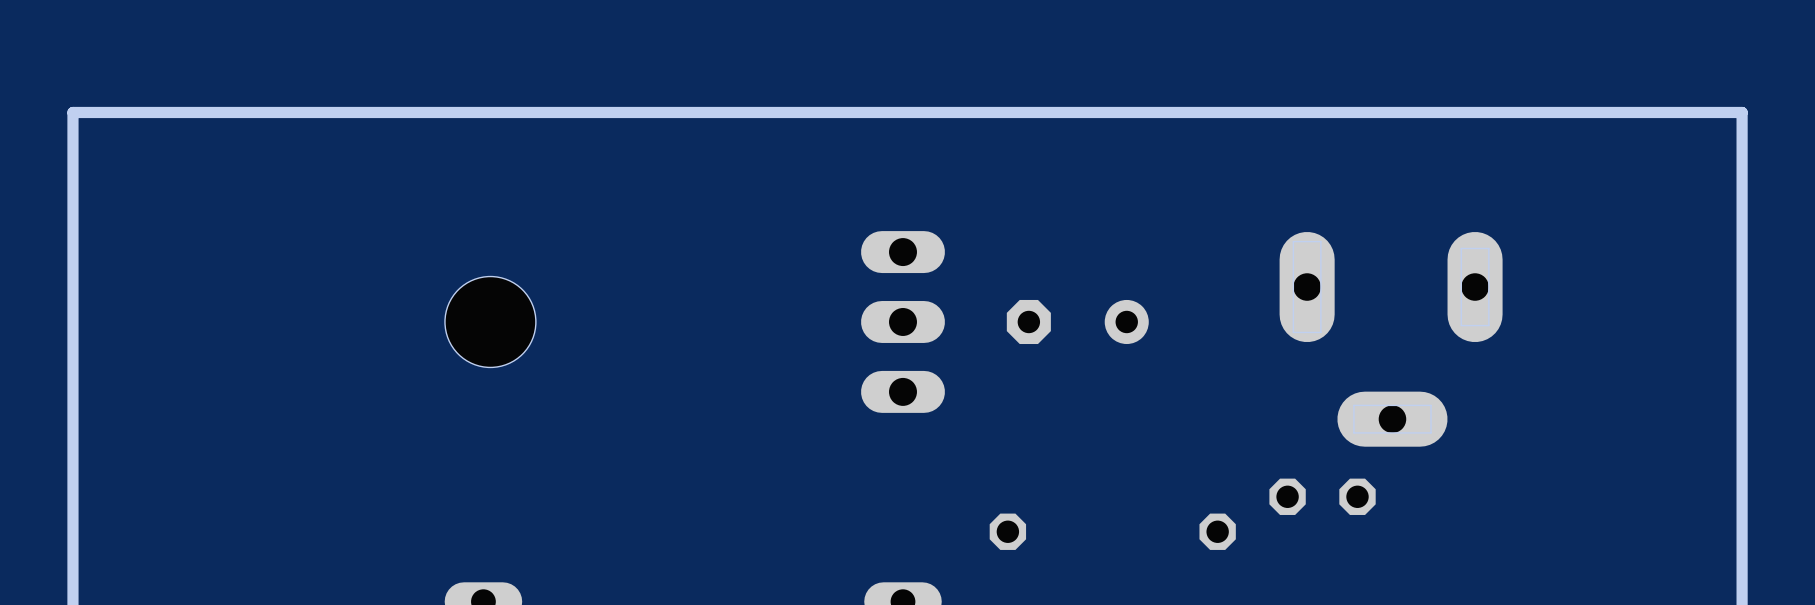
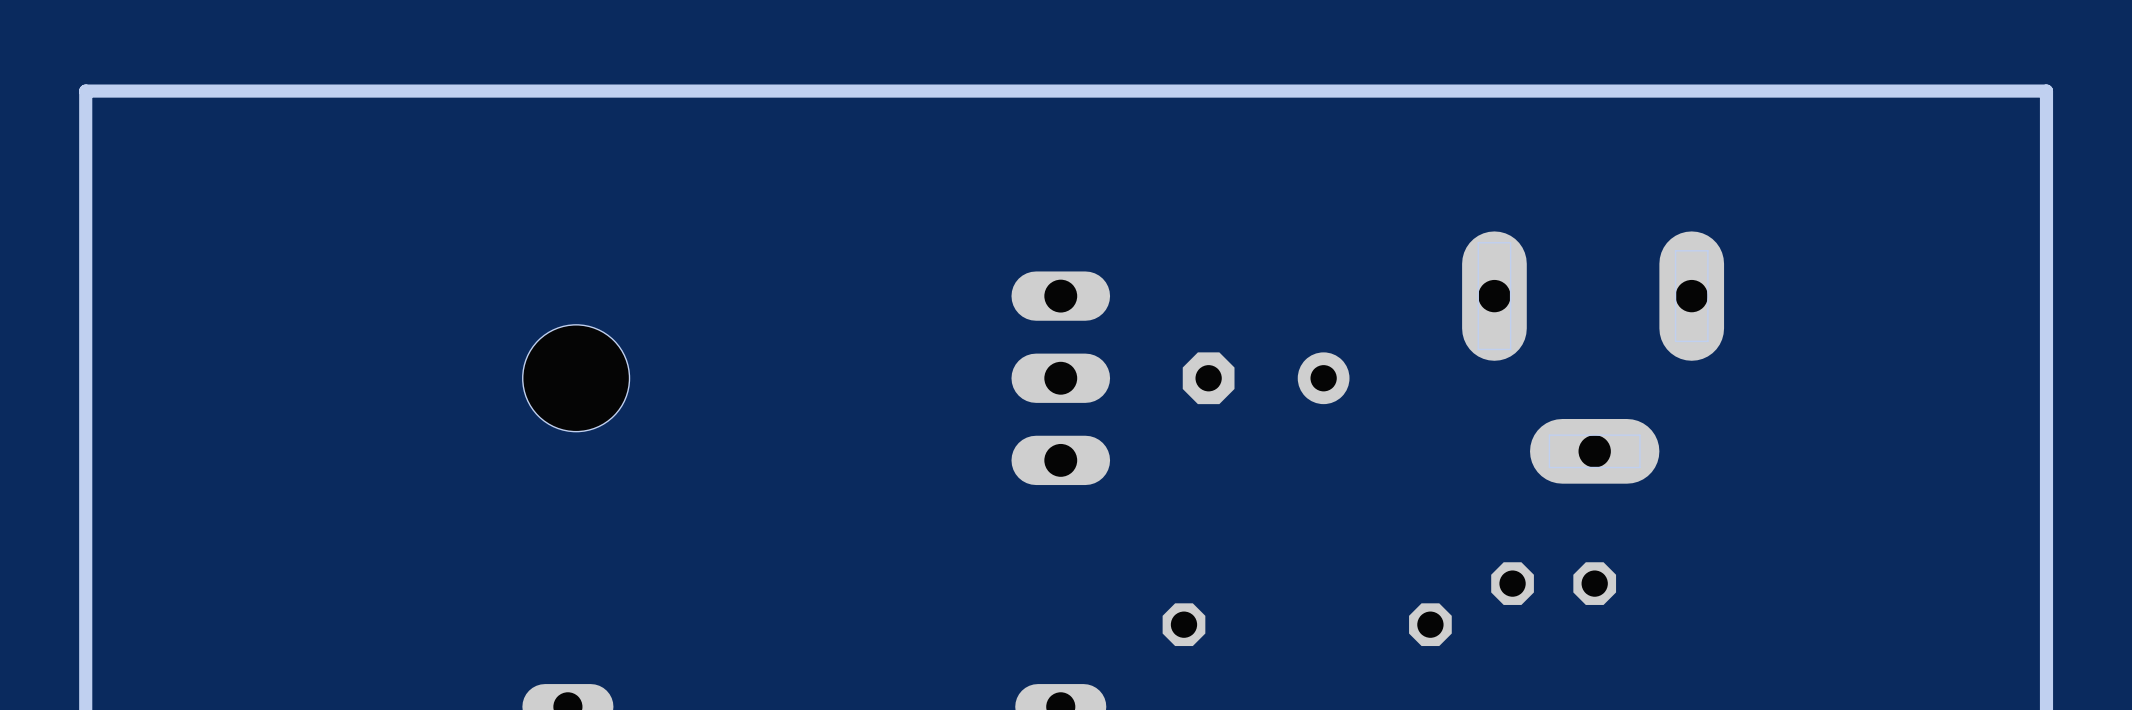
board edge: (1742, 112) (72, 112) -> (2046, 132) (2046, 91) (85, 91) (85, 132)
part position: (1391, 339) -> (1593, 357)

